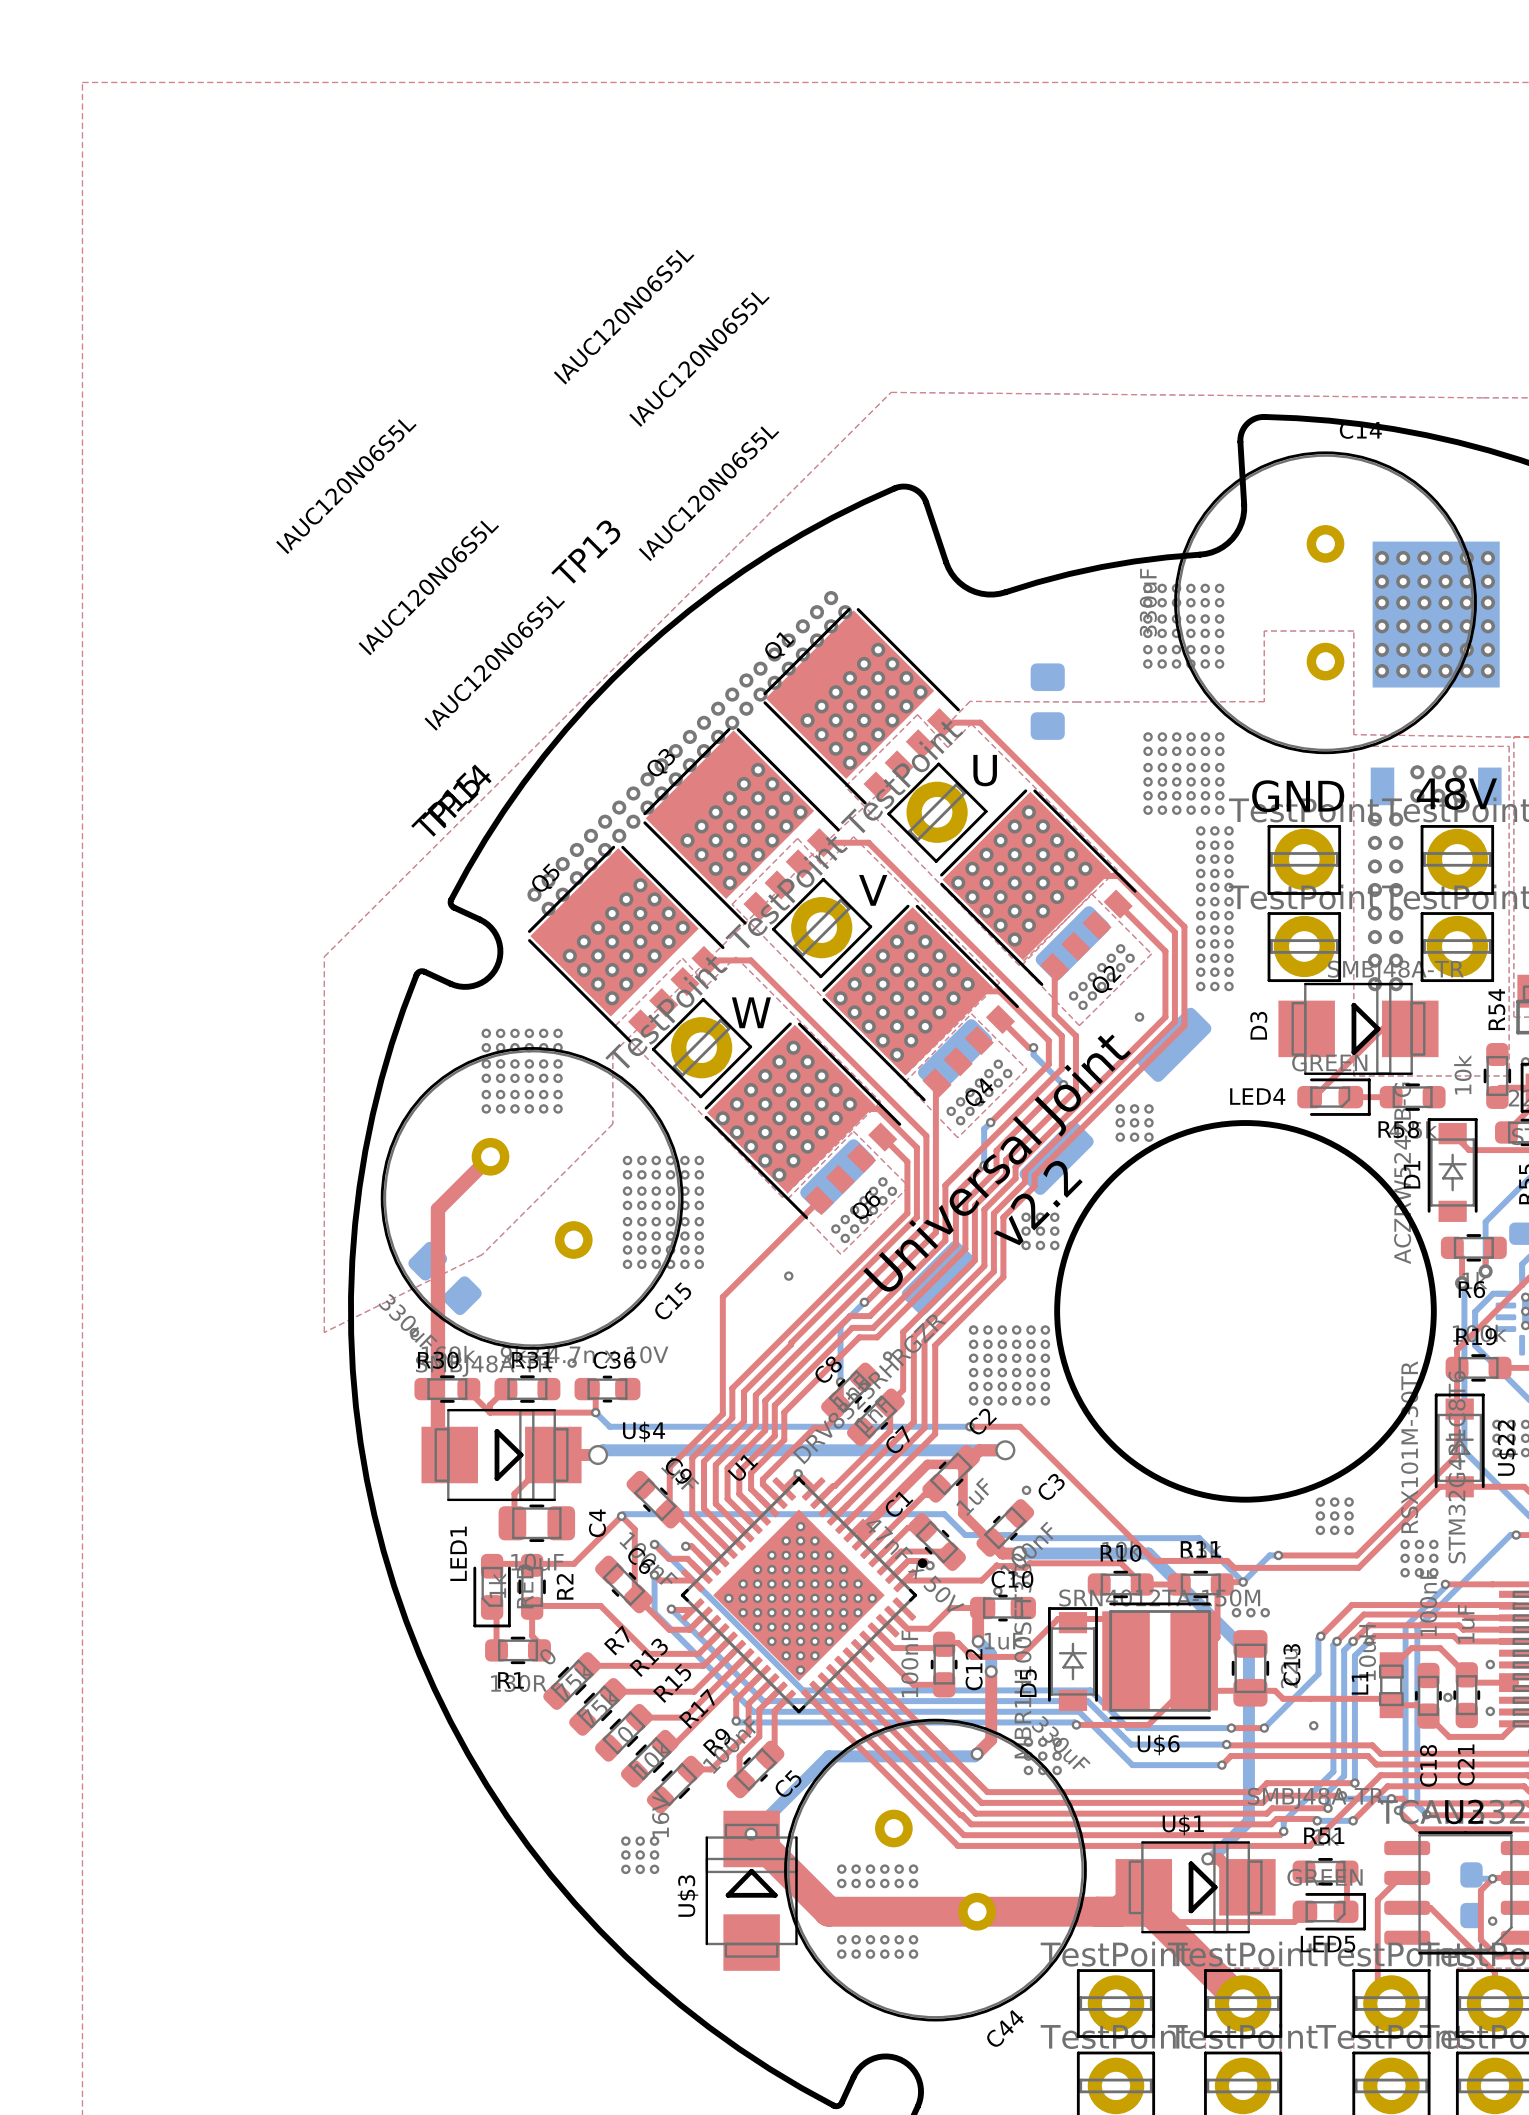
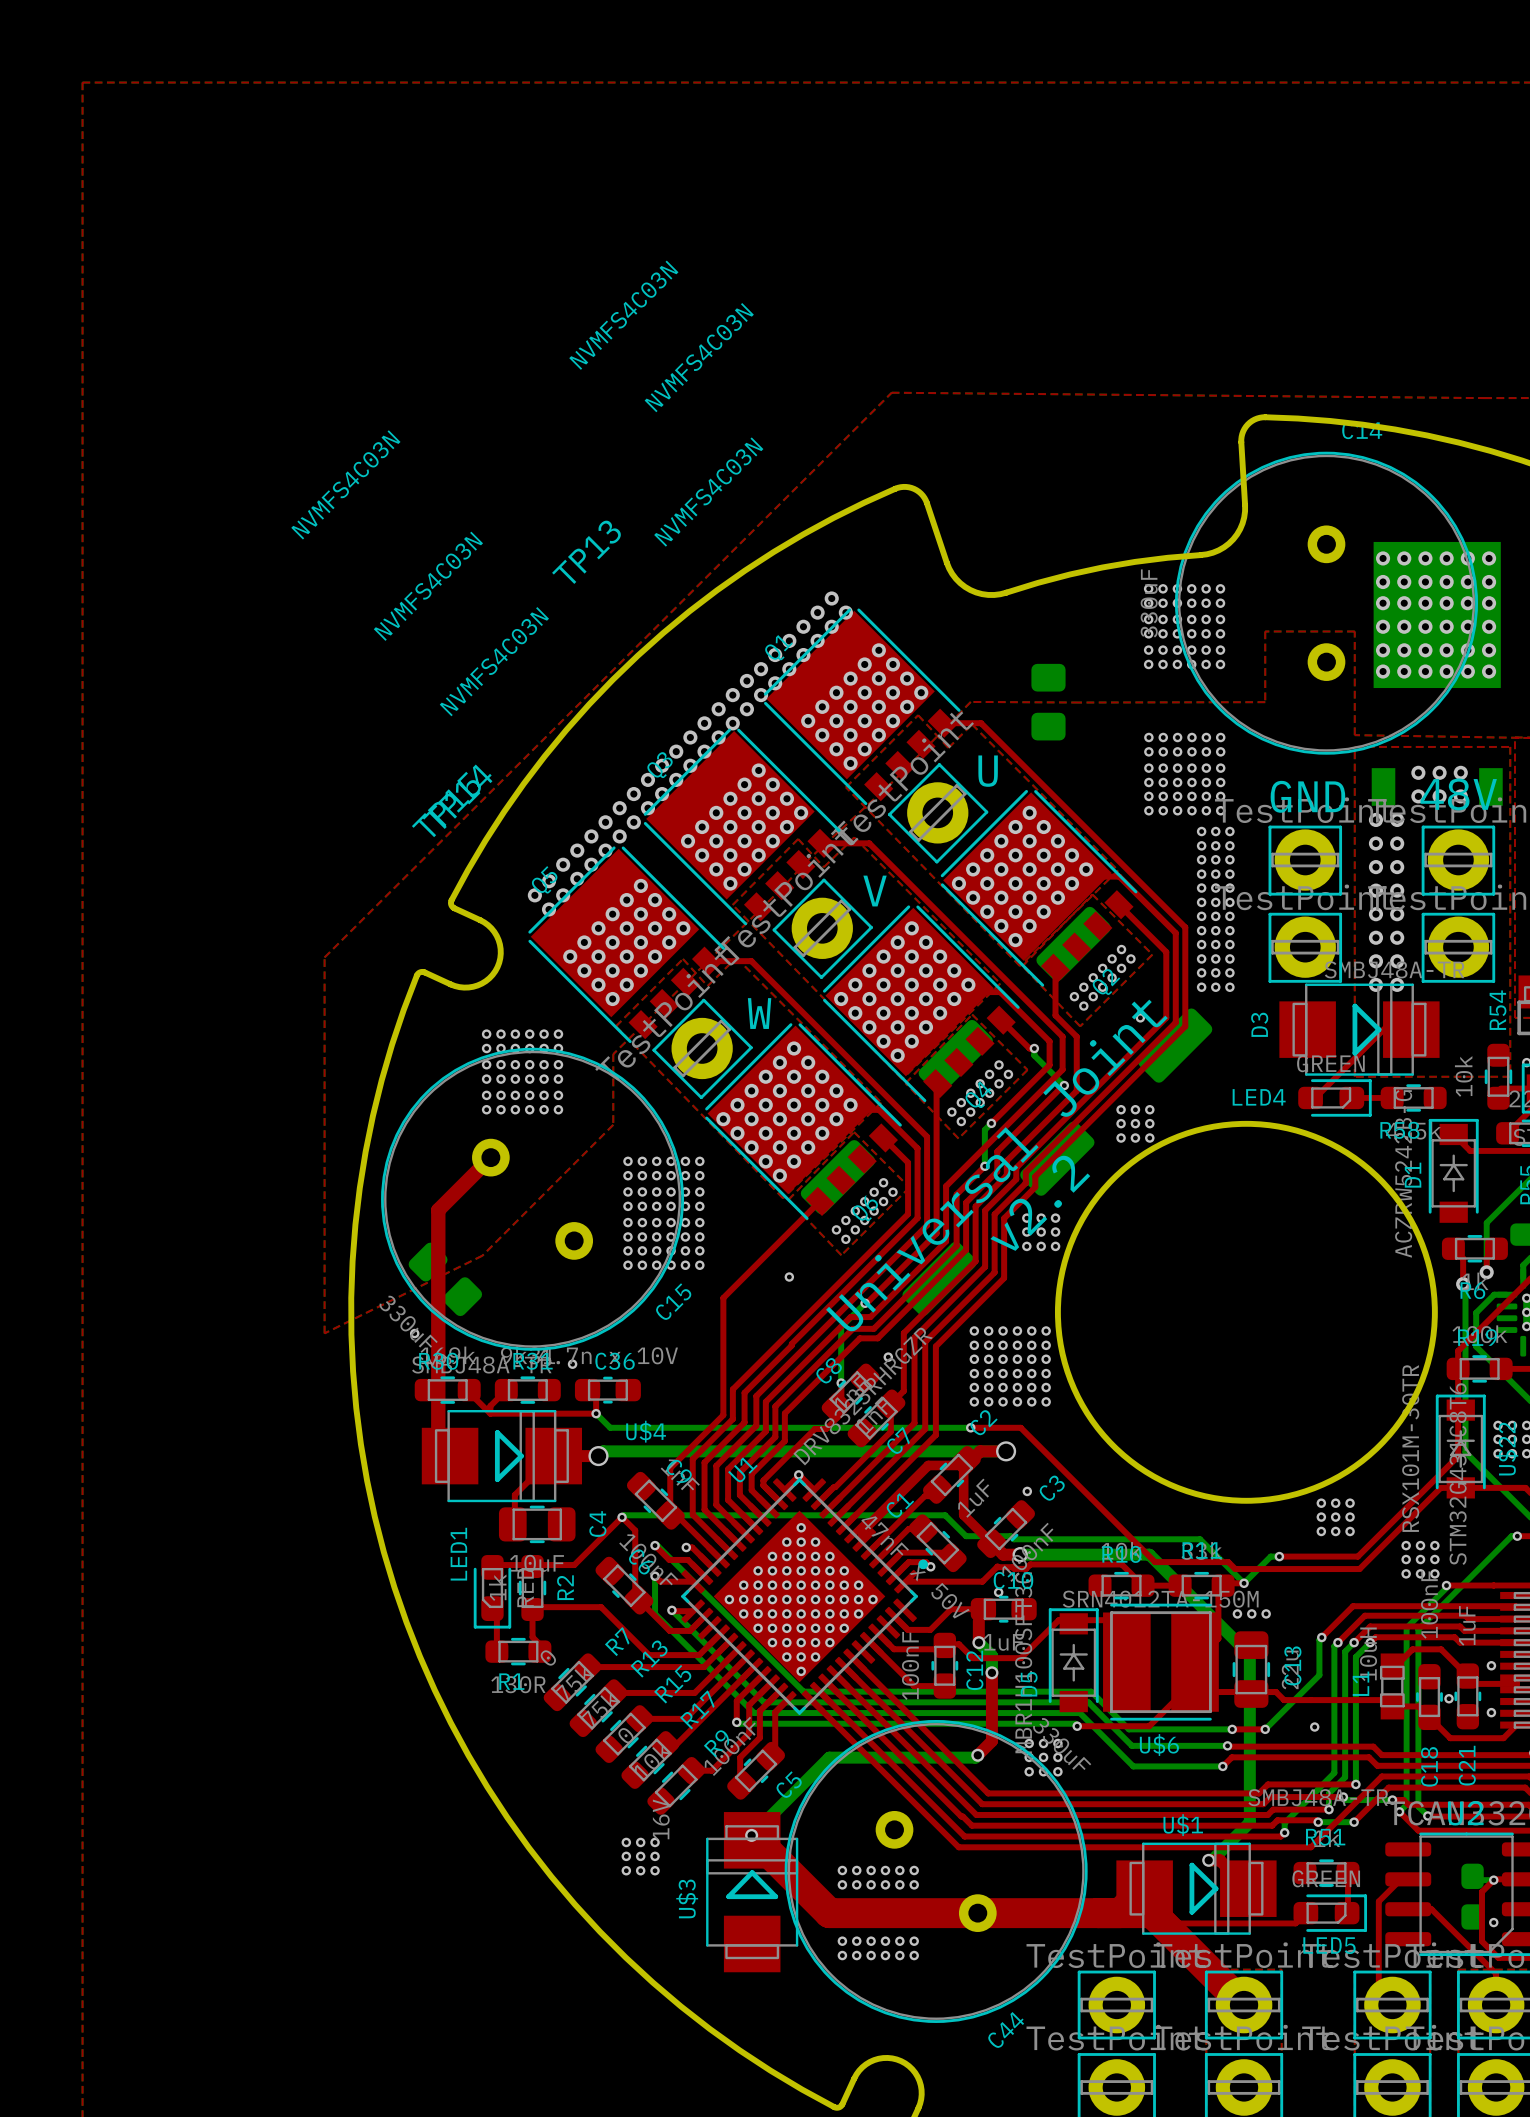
Q3 value: IAUC120N06S5L (624, 317) -> NVMFS4C03N (623, 315)
Q1 value: IAUC120N06S5L (699, 359) -> NVMFS4C03N (699, 357)
Q5 value: IAUC120N06S5L (346, 486) -> NVMFS4C03N (345, 484)
Q2 value: IAUC120N06S5L (709, 493) -> NVMFS4C03N (708, 492)
Q6 value: IAUC120N06S5L (428, 587) -> NVMFS4C03N (428, 586)
Q4 value: IAUC120N06S5L (494, 663) -> NVMFS4C03N (494, 661)

